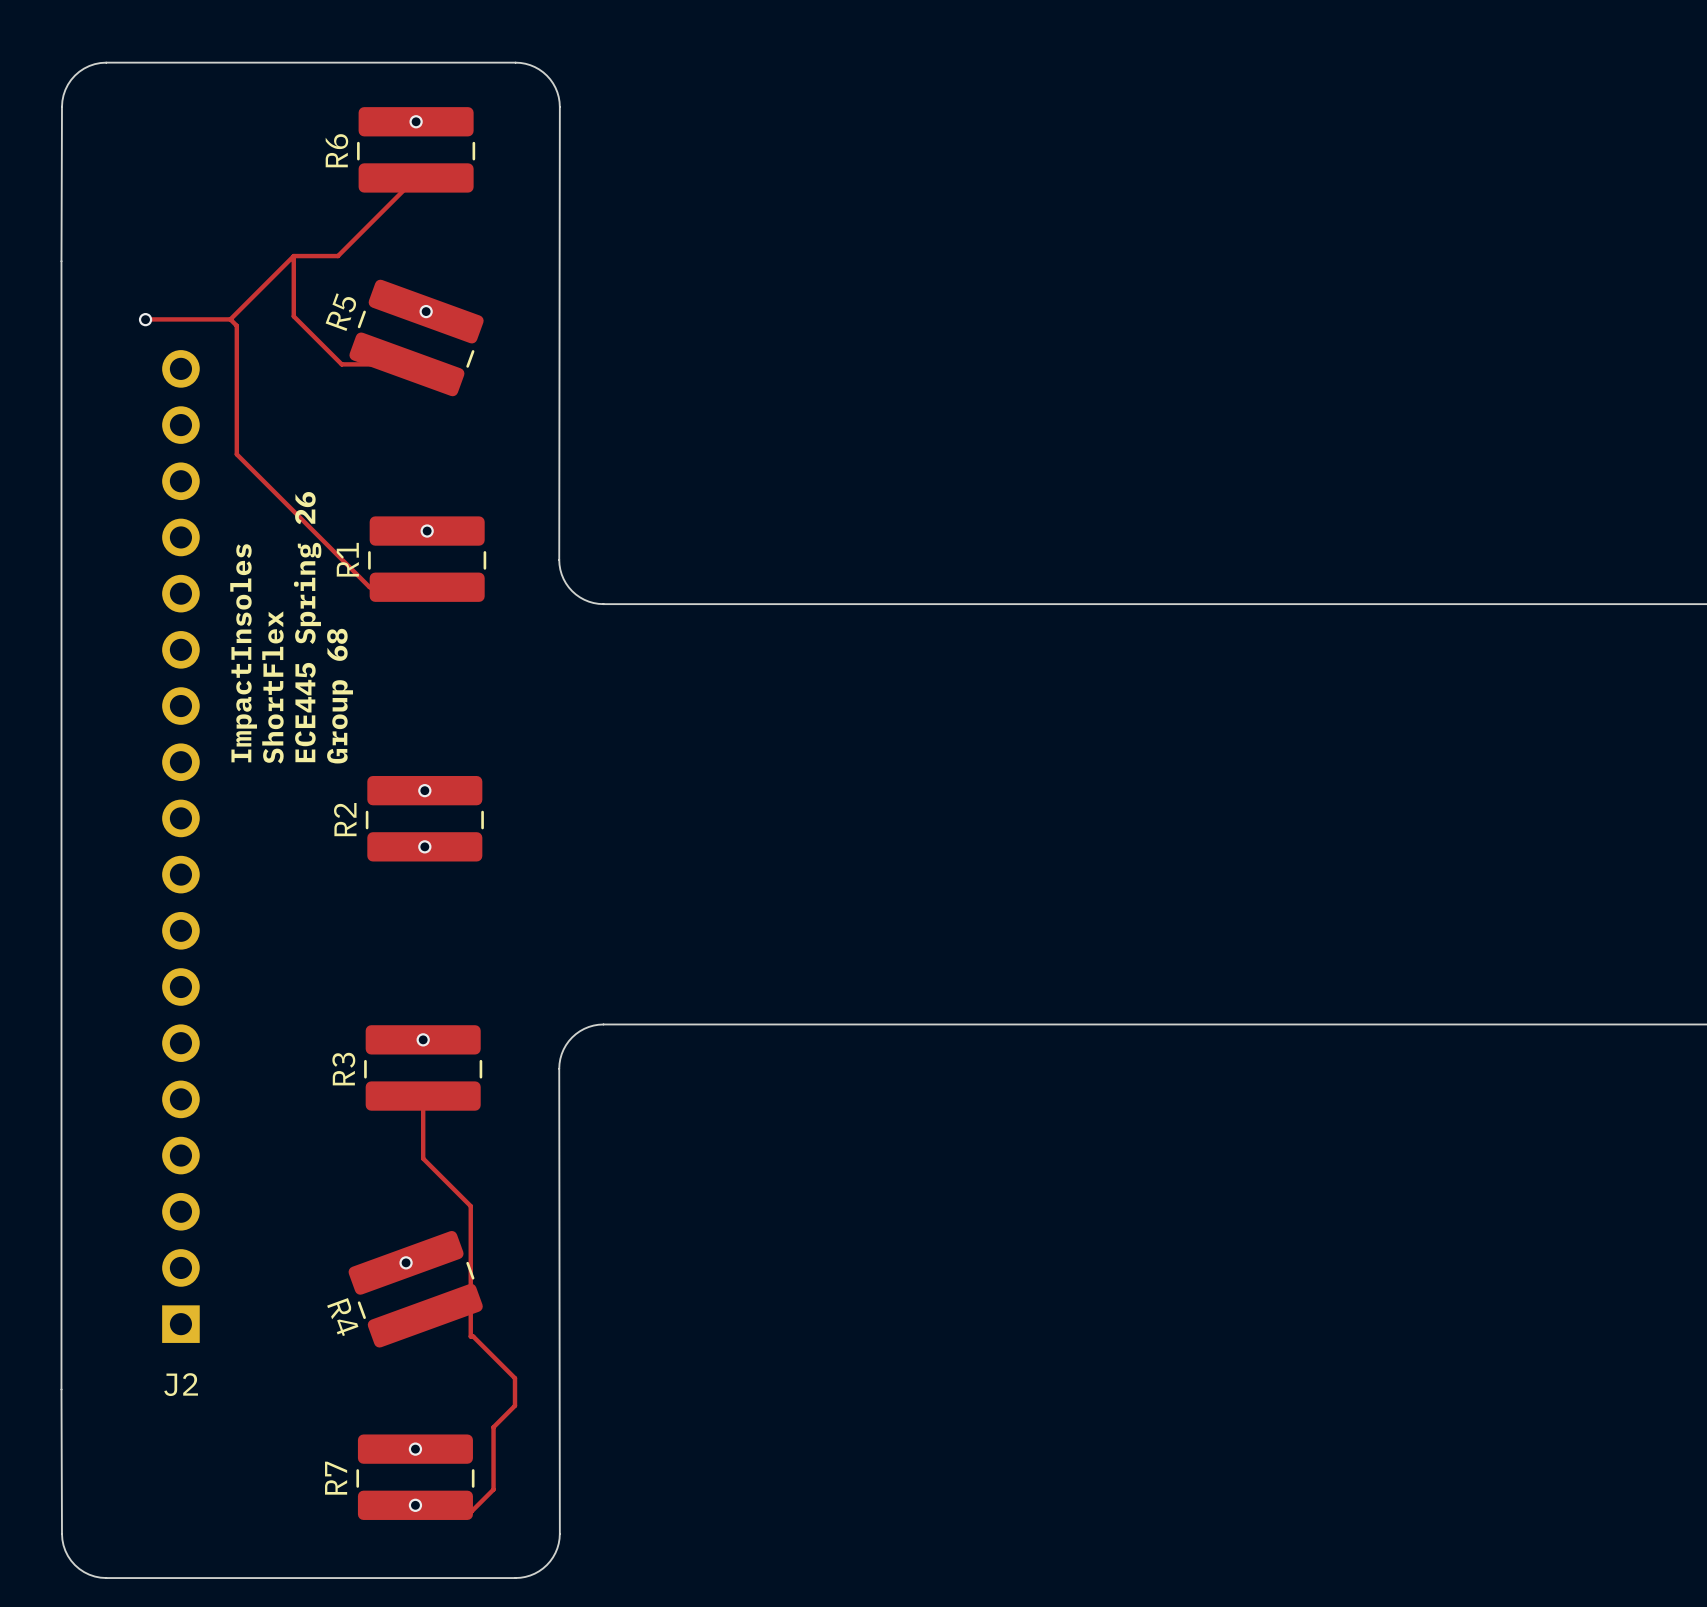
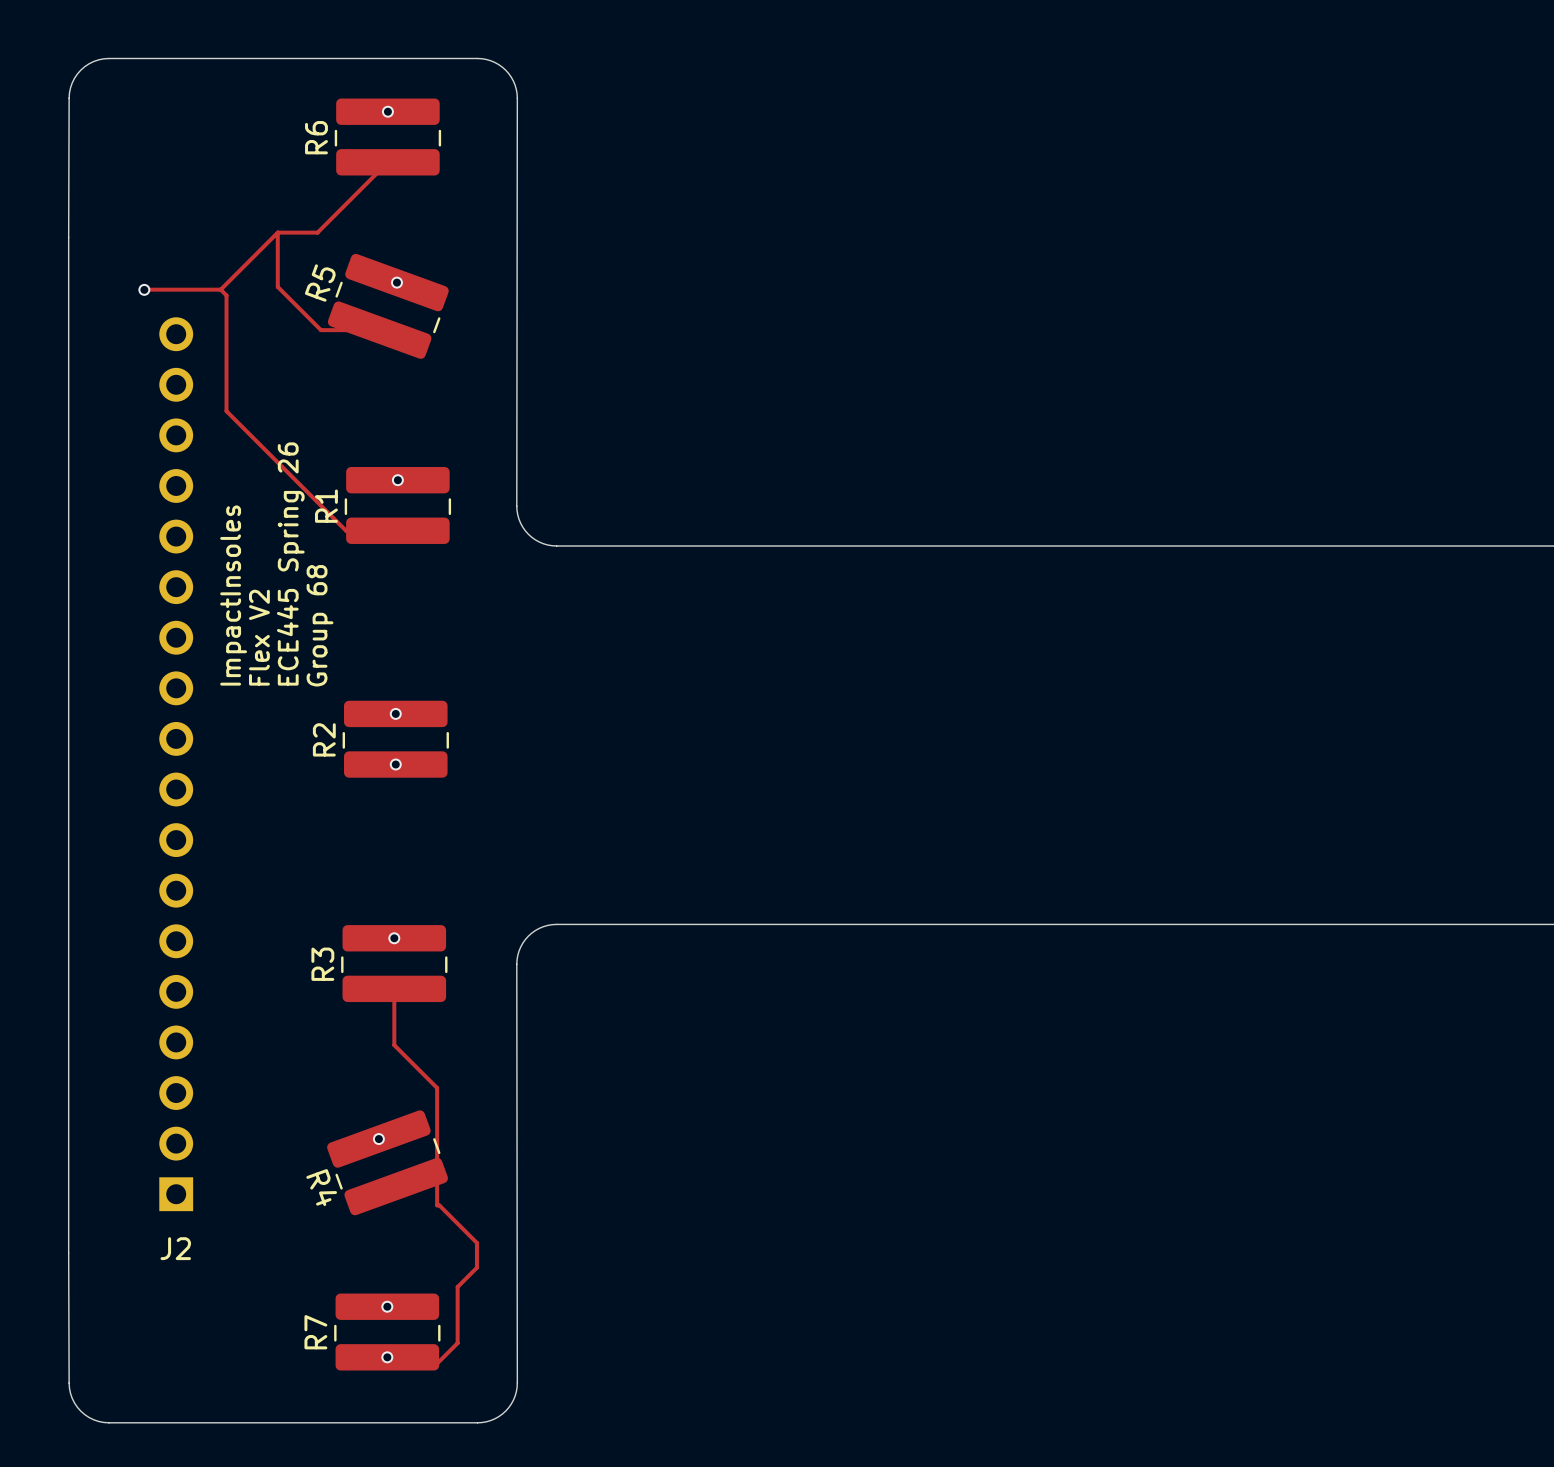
text: ShortFlex (272, 687) -> Flex V2 (259, 637)

